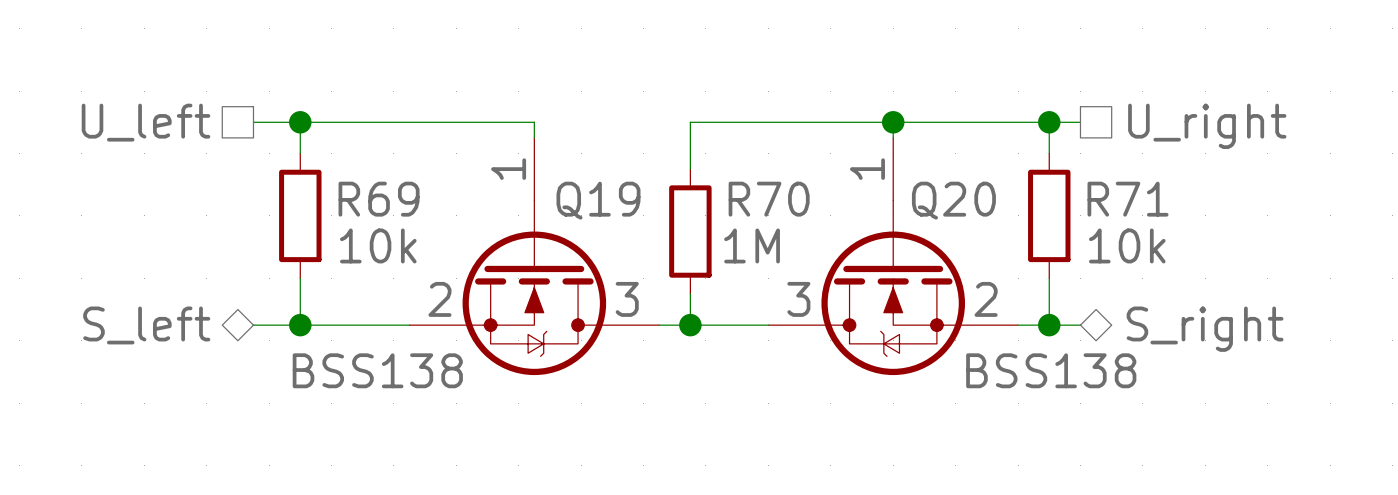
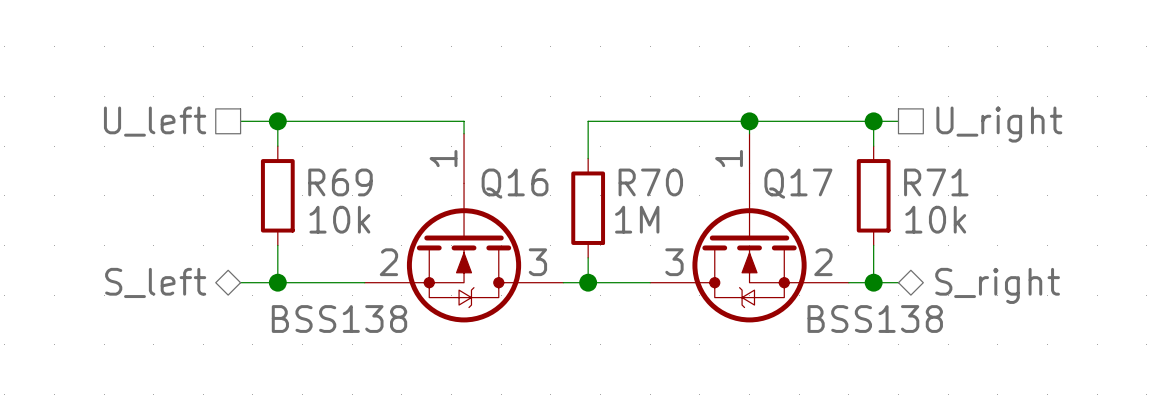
Q19 name: Q19 (598, 200) -> Q16 (515, 183)
Q20 name: Q20 (953, 200) -> Q17 (798, 183)

